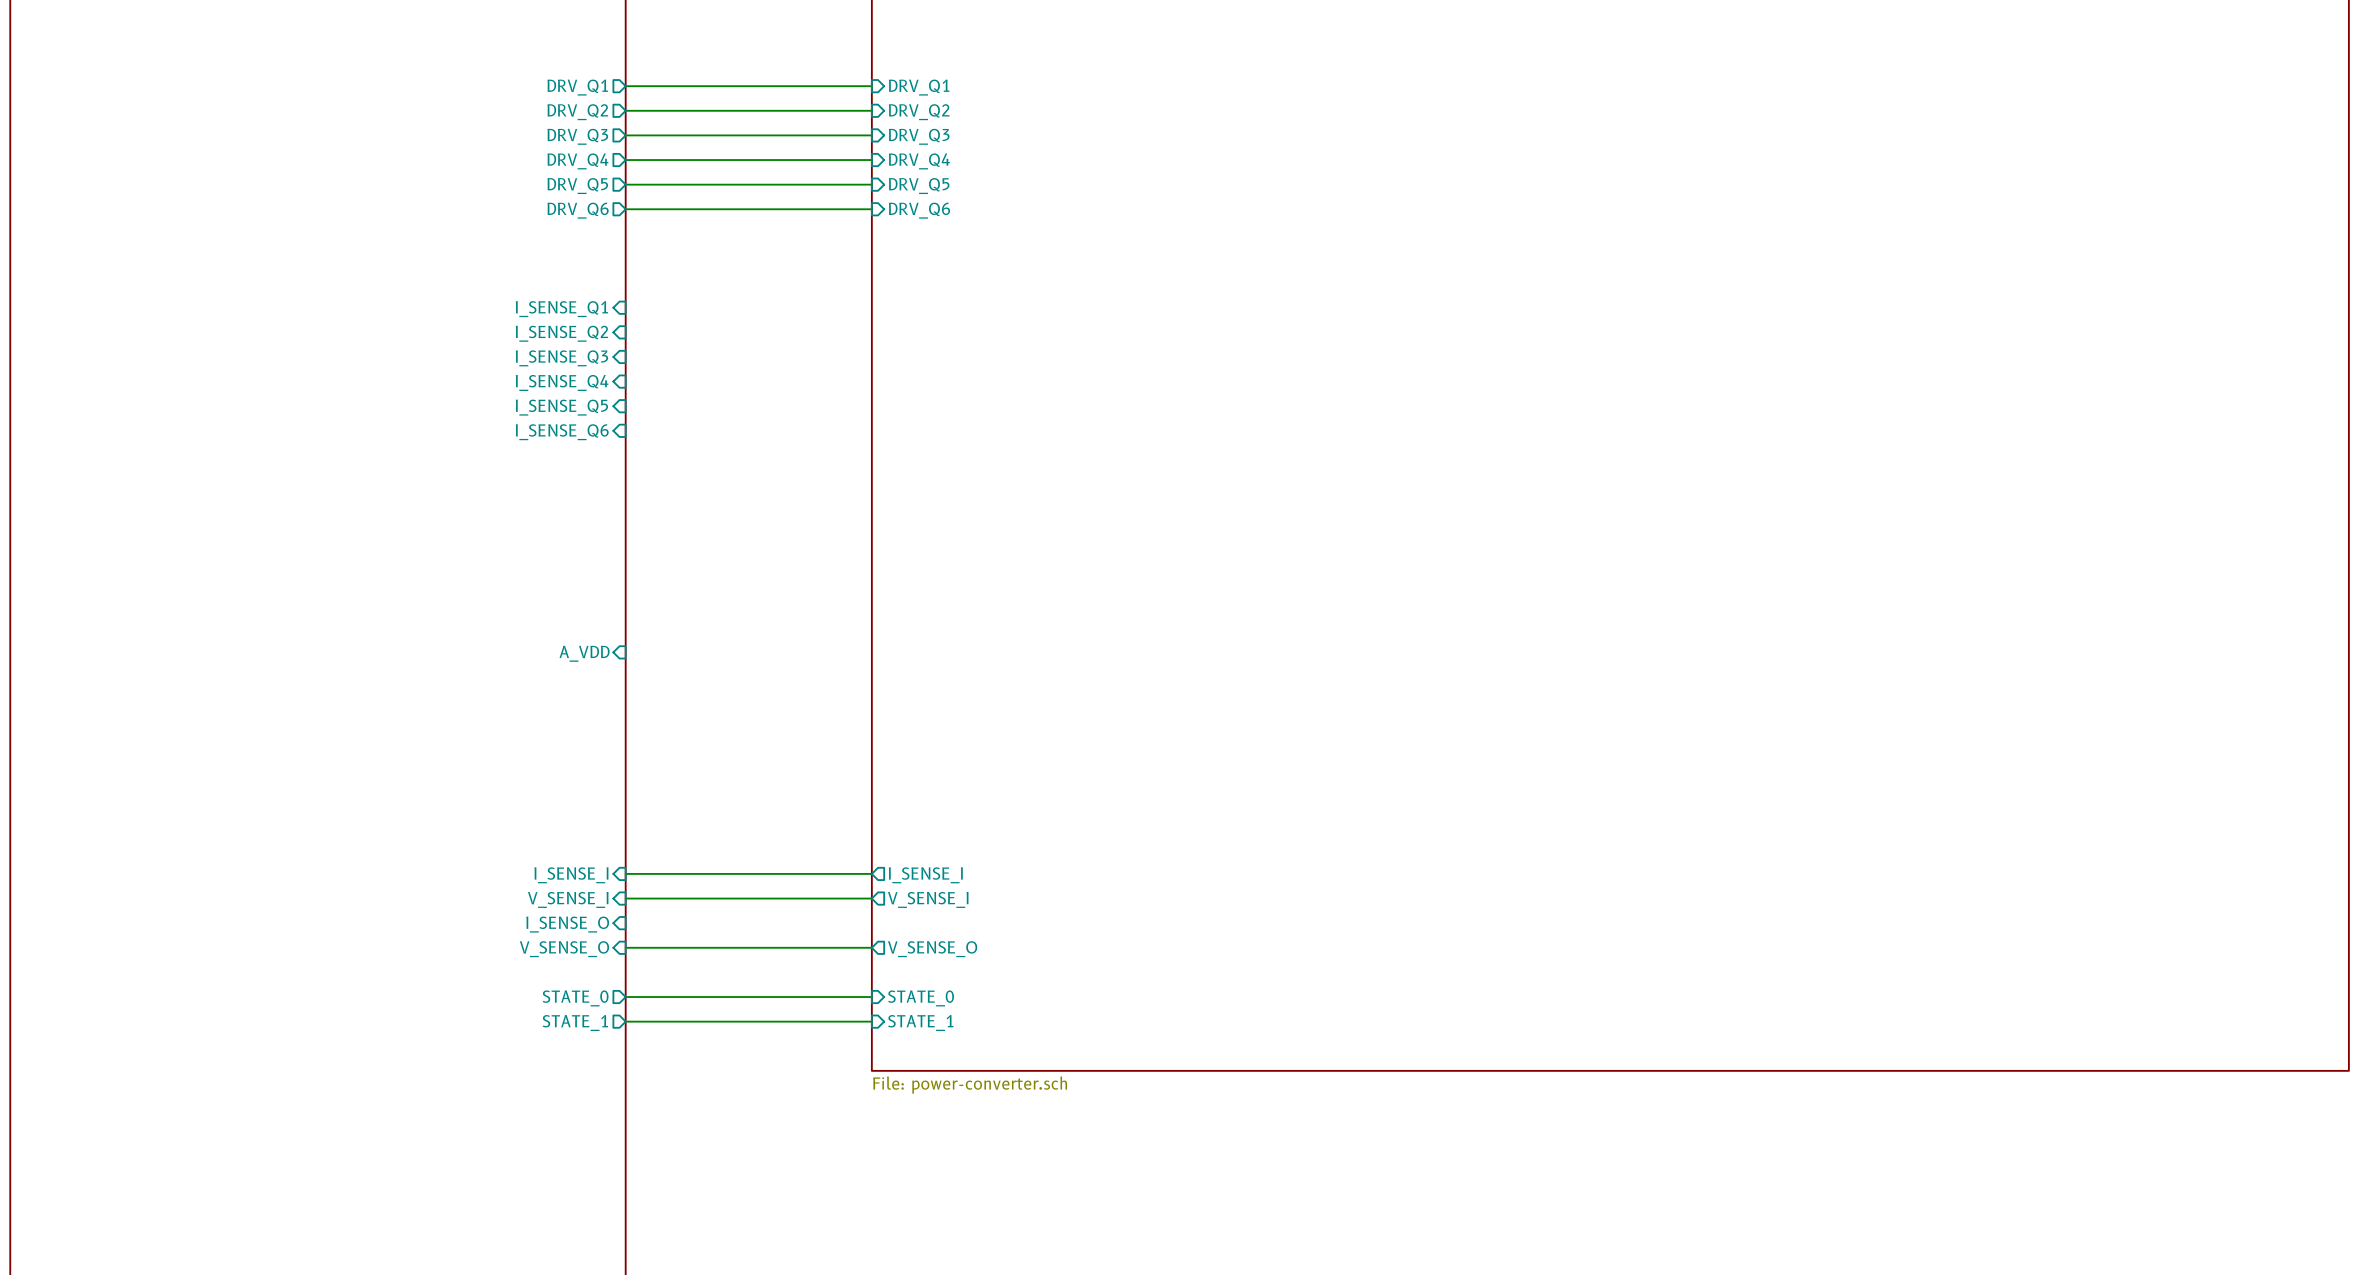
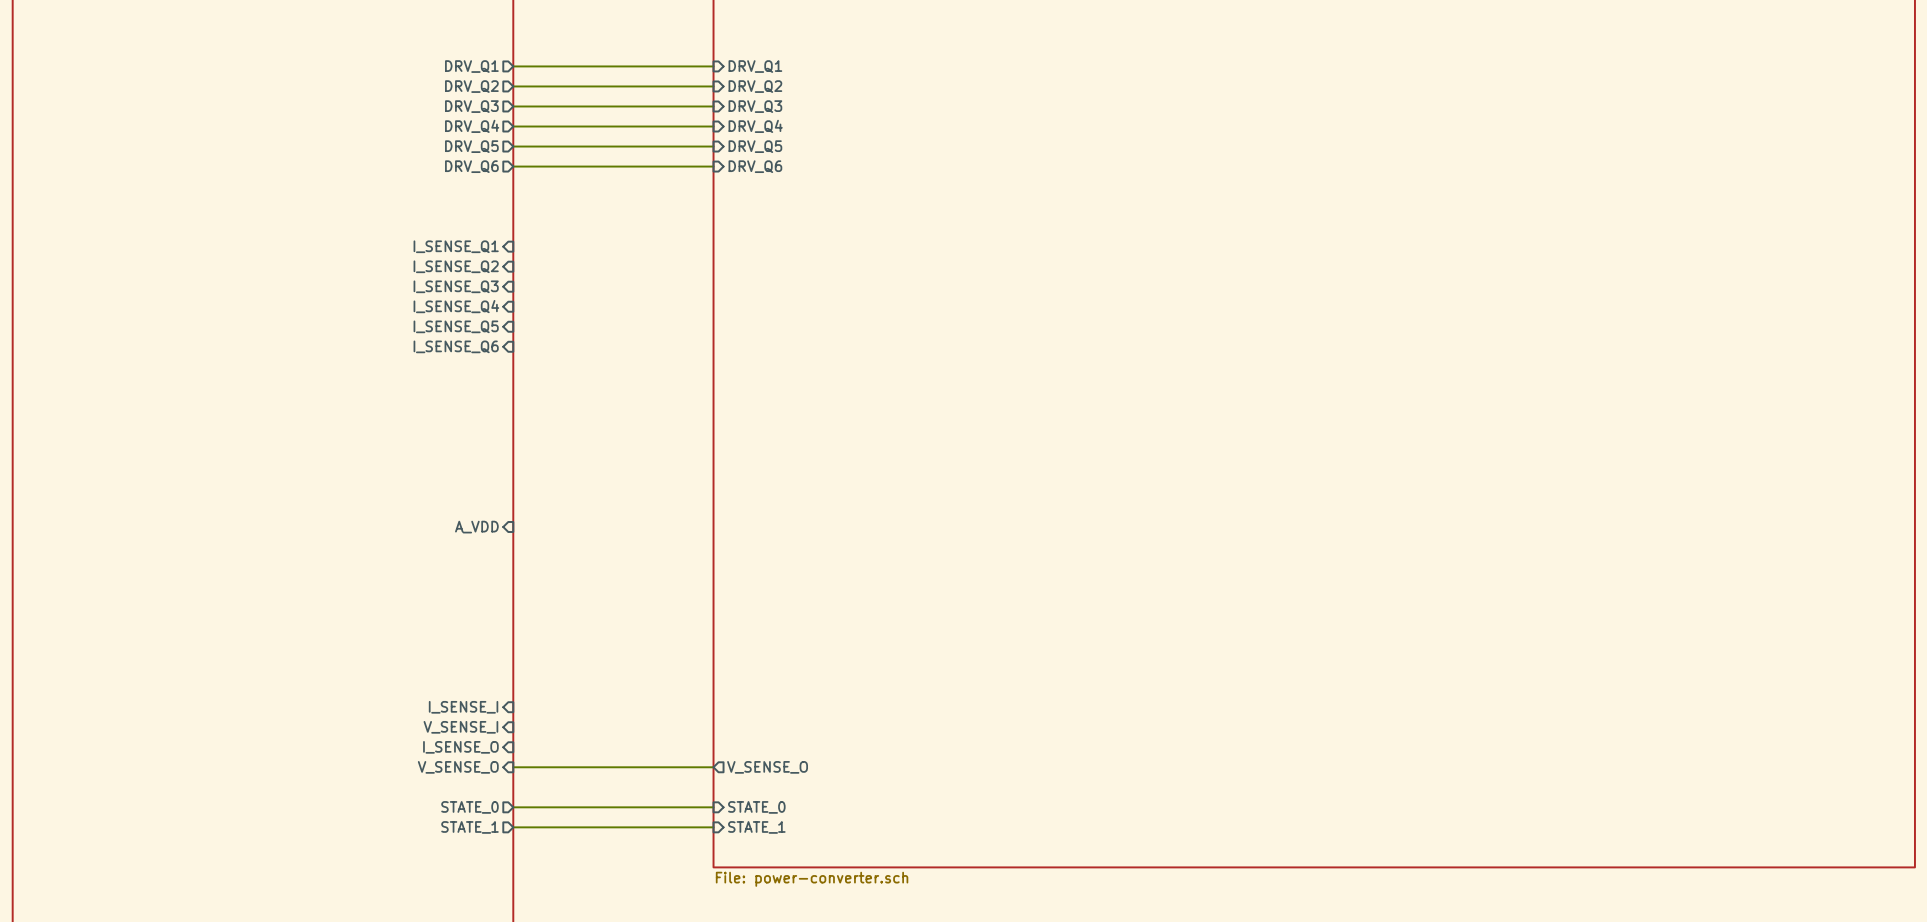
wire: (625, 873) (871, 873) -> none
sheet pin: I_SENSE_I (925, 875) -> none
wire: (625, 898) (871, 898) -> none
sheet pin: V_SENSE_I (928, 899) -> none

